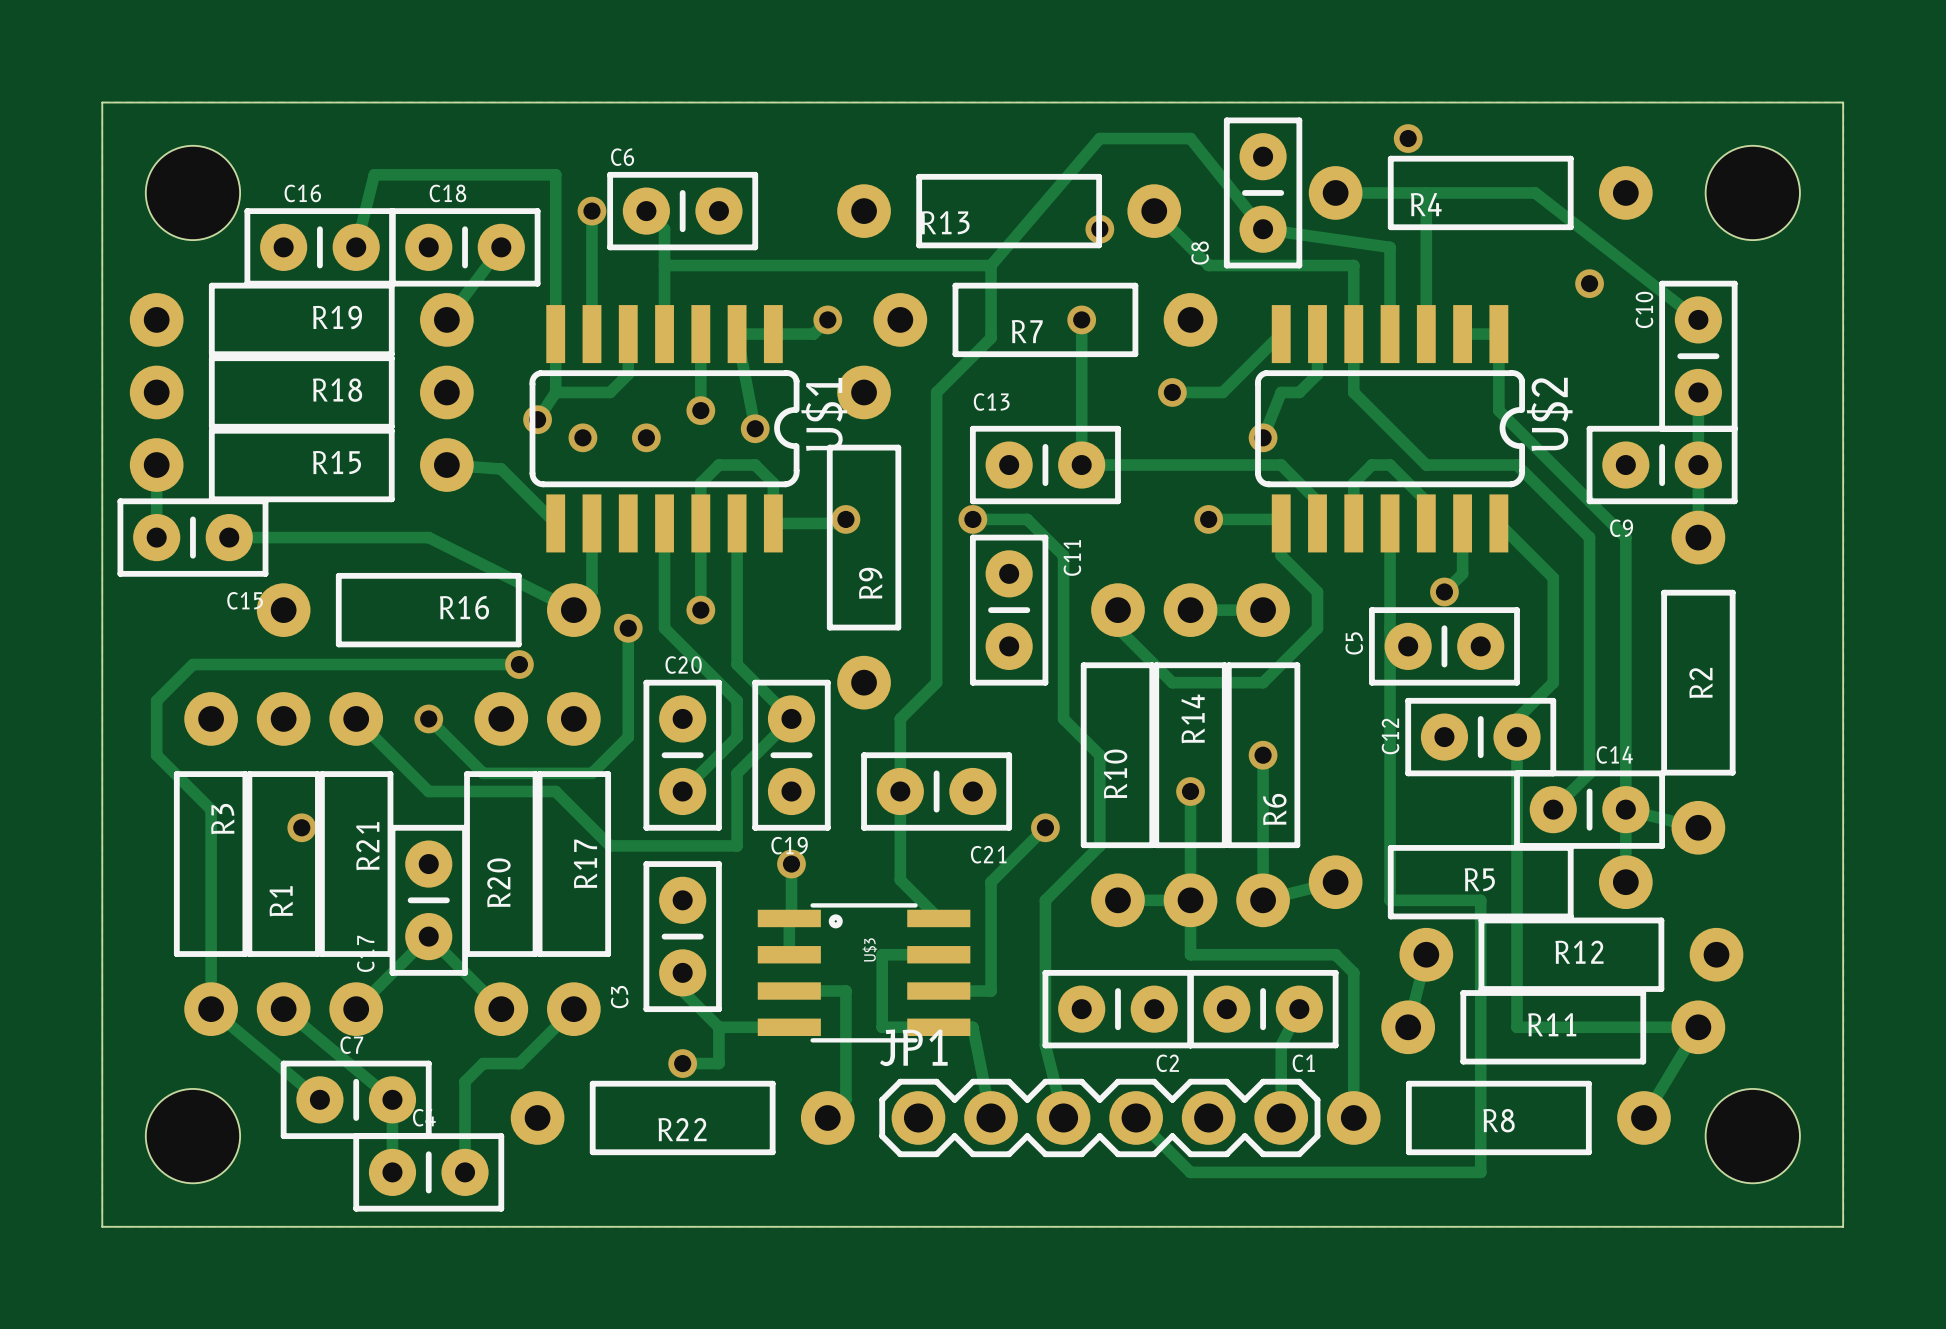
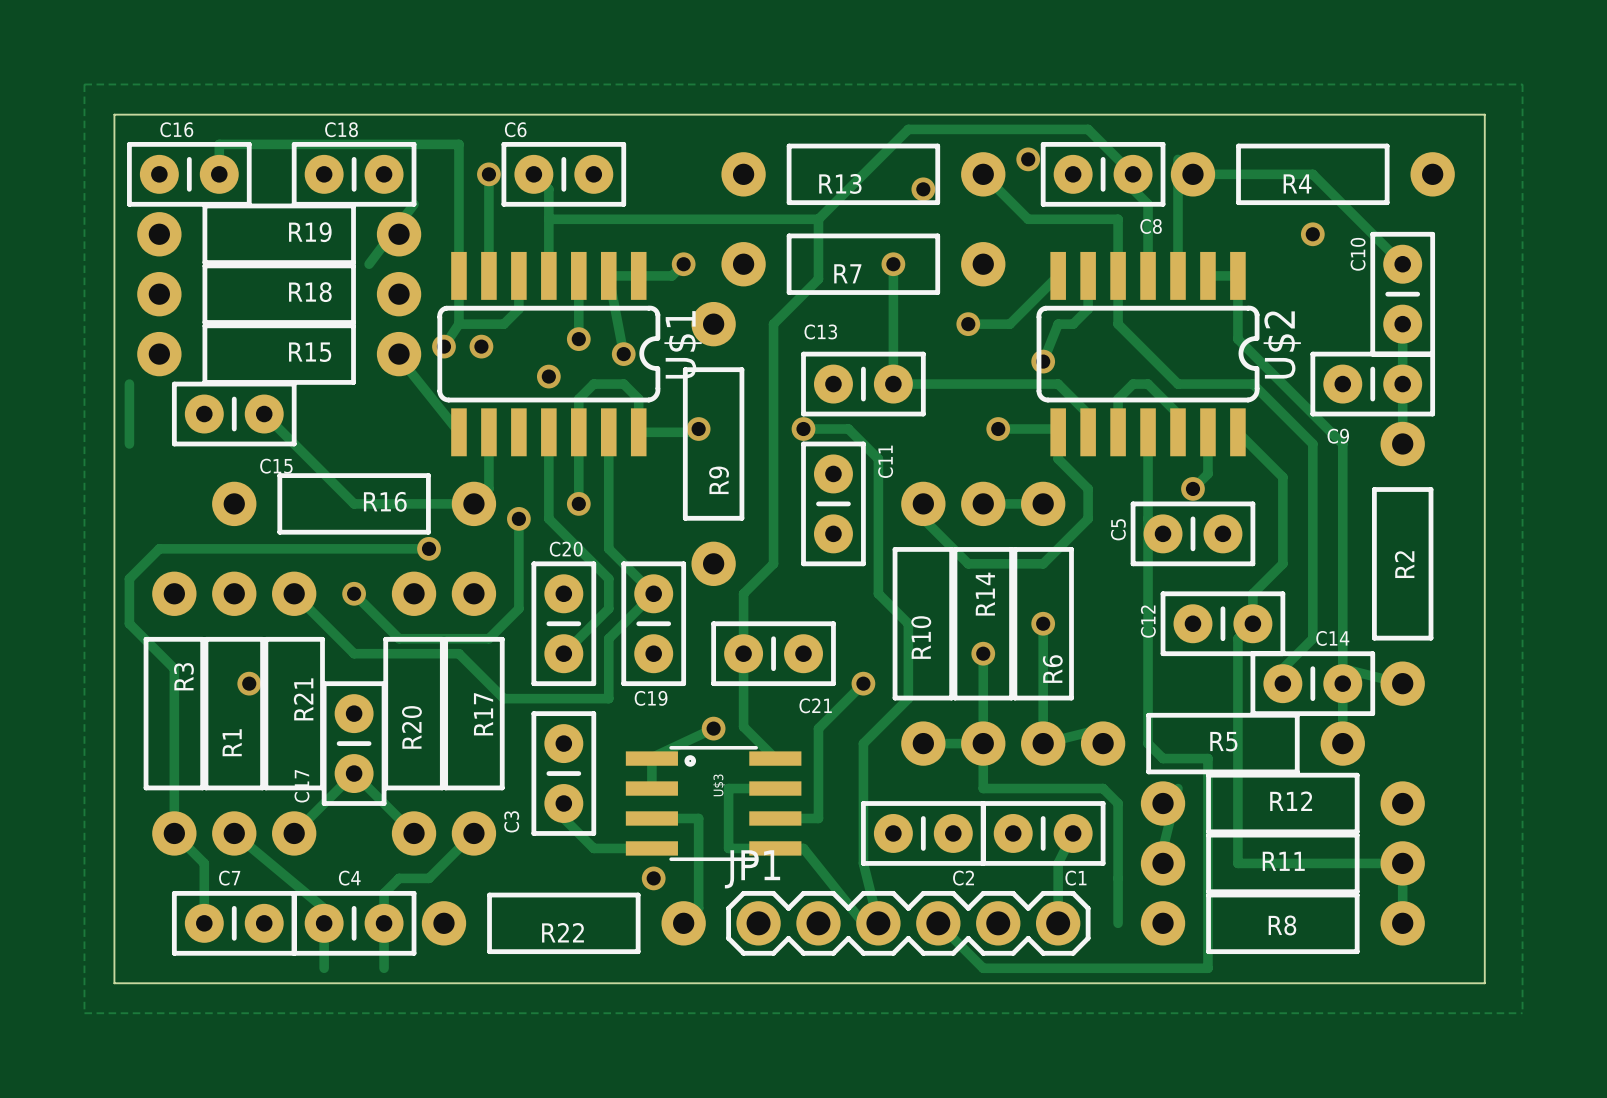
board edge: (102, 102) (1843, 102) (1843, 1226) (102, 1226) (102, 102) -> (114, 114) (114, 983) (1484, 983) (1484, 114) (114, 114)
via: (1408, 138) -> none
track: (374, 174) (356, 247) -> (309, 144) (219, 144) (219, 174)
part: (192, 192) -> none
via: none -> (1028, 159)
C8 rotation: 0° (1263, 192) -> 90° clockwise (1103, 174)
track: (1335, 192) (1535, 192) (1698, 319) -> (1178, 174) (1312, 174) (1402, 264)
R4 position: (1480, 192) -> (1312, 174)
part: (1752, 192) -> none
R4 name position: R4 (1426, 204) -> R4 (1297, 183)
R13 position: (1009, 211) -> (863, 174)
track: (1154, 211) (1208, 265) (1244, 265) -> (983, 174) (1028, 219)
R13 name position: R13 (945, 222) -> R13 (840, 183)
via position: (1099, 229) -> (923, 189)
C16 position: (319, 247) -> (189, 174)
C18 position: (465, 247) -> (354, 174)
track: (1390, 247) (1263, 229) (1190, 138) (1099, 138) (991, 265) -> (1148, 204) (1133, 189) (1133, 174) (1088, 129) (908, 129) (818, 219)
C8 name position: C8 (1200, 253) -> C8 (1151, 226)
R19 position: (301, 319) -> (279, 234)
R18 position: (301, 392) -> (279, 294)
via position: (582, 437) -> (481, 346)
via position: (646, 437) -> (548, 376)
R15 position: (301, 465) -> (279, 354)
track: (446, 465) (501, 469) (555, 523) -> (399, 354) (399, 357) (458, 432)
C15 position: (192, 537) -> (234, 414)
track: (229, 537) (428, 537) (573, 610) -> (264, 414) (354, 503) (473, 503)
C12 position: (1480, 737) -> (1222, 623)
track: (1517, 755) (1517, 1027) (1698, 1027) (1643, 1117) -> (1252, 623) (1237, 638) (1237, 863) (1402, 863) (1402, 923)
C14 position: (1589, 809) -> (1312, 683)
track: (791, 864) (791, 916) -> (713, 728) (653, 756)
via position: (791, 864) -> (713, 728)
R5 position: (1480, 882) -> (1222, 743)
track: (1390, 900) (1480, 900) (1480, 1172) (1462, 1172) -> (1148, 743) (1163, 758) (1207, 758) (1207, 968)
R12 position: (1571, 954) -> (1282, 803)
track: (211, 1009) (319, 1099) -> (174, 833) (204, 863) (204, 923)
track: (718, 1027) (718, 1063) (682, 1063) -> none
track: (972, 1027) (991, 1117) -> (803, 848) (863, 923)
R11 position: (1553, 1027) -> (1282, 863)
via: (682, 1063) -> none
via: none -> (653, 878)
C7 position: (356, 1099) -> (234, 923)
R8 position: (1498, 1117) -> (1282, 923)
part: (192, 1136) -> none
part: (1752, 1136) -> none
C4 position: (428, 1172) -> (354, 923)

